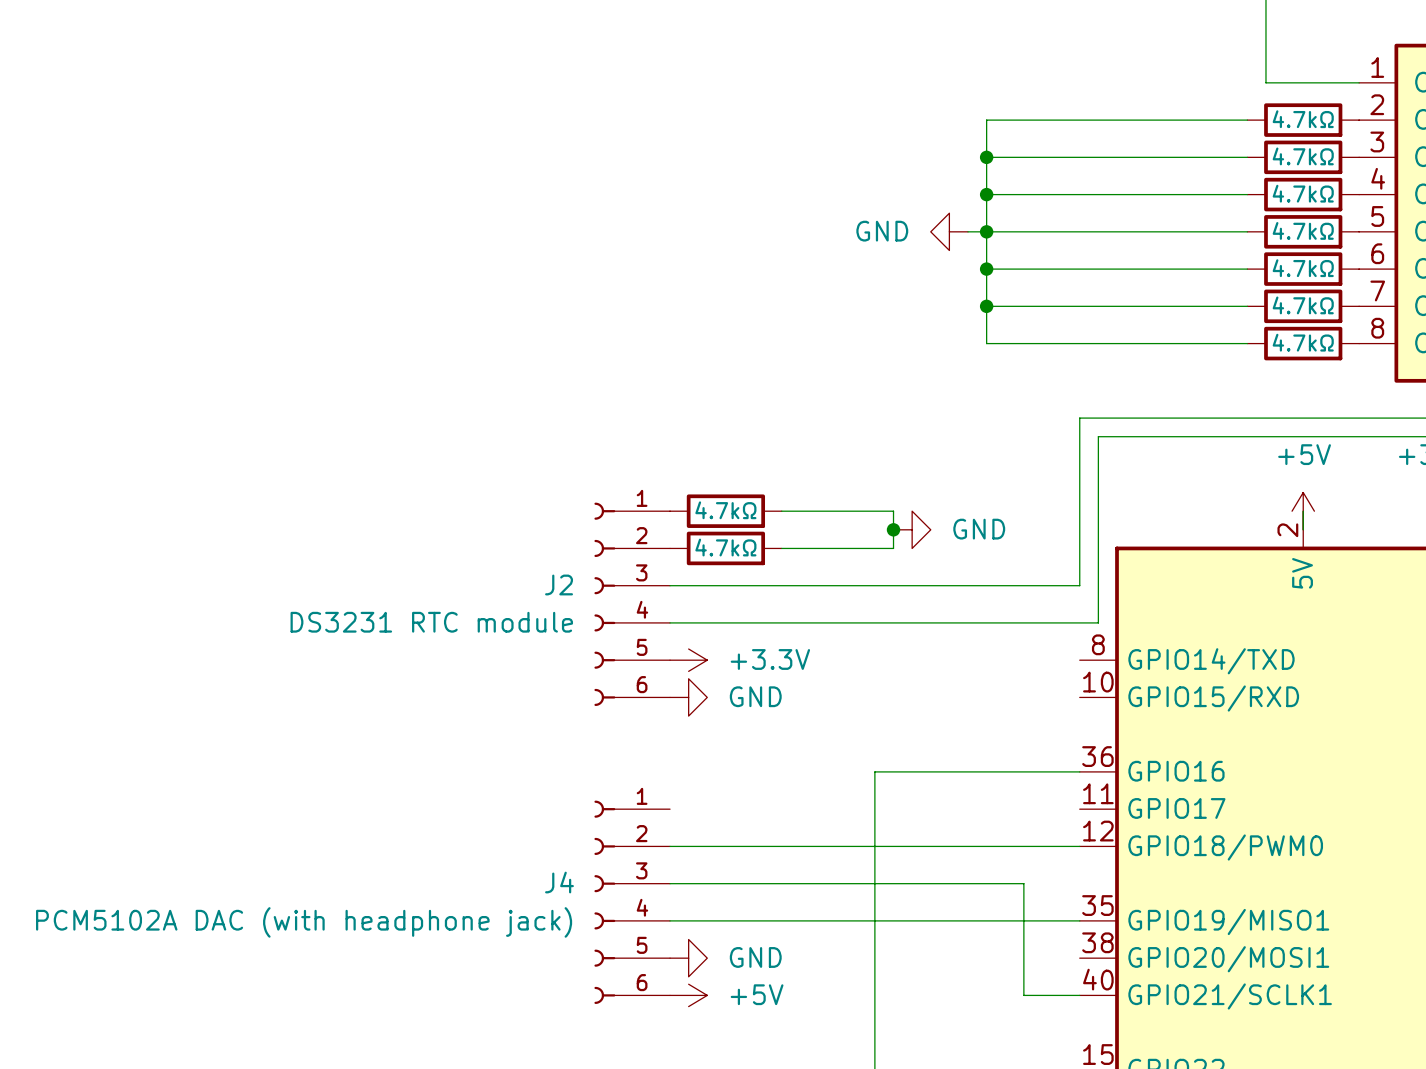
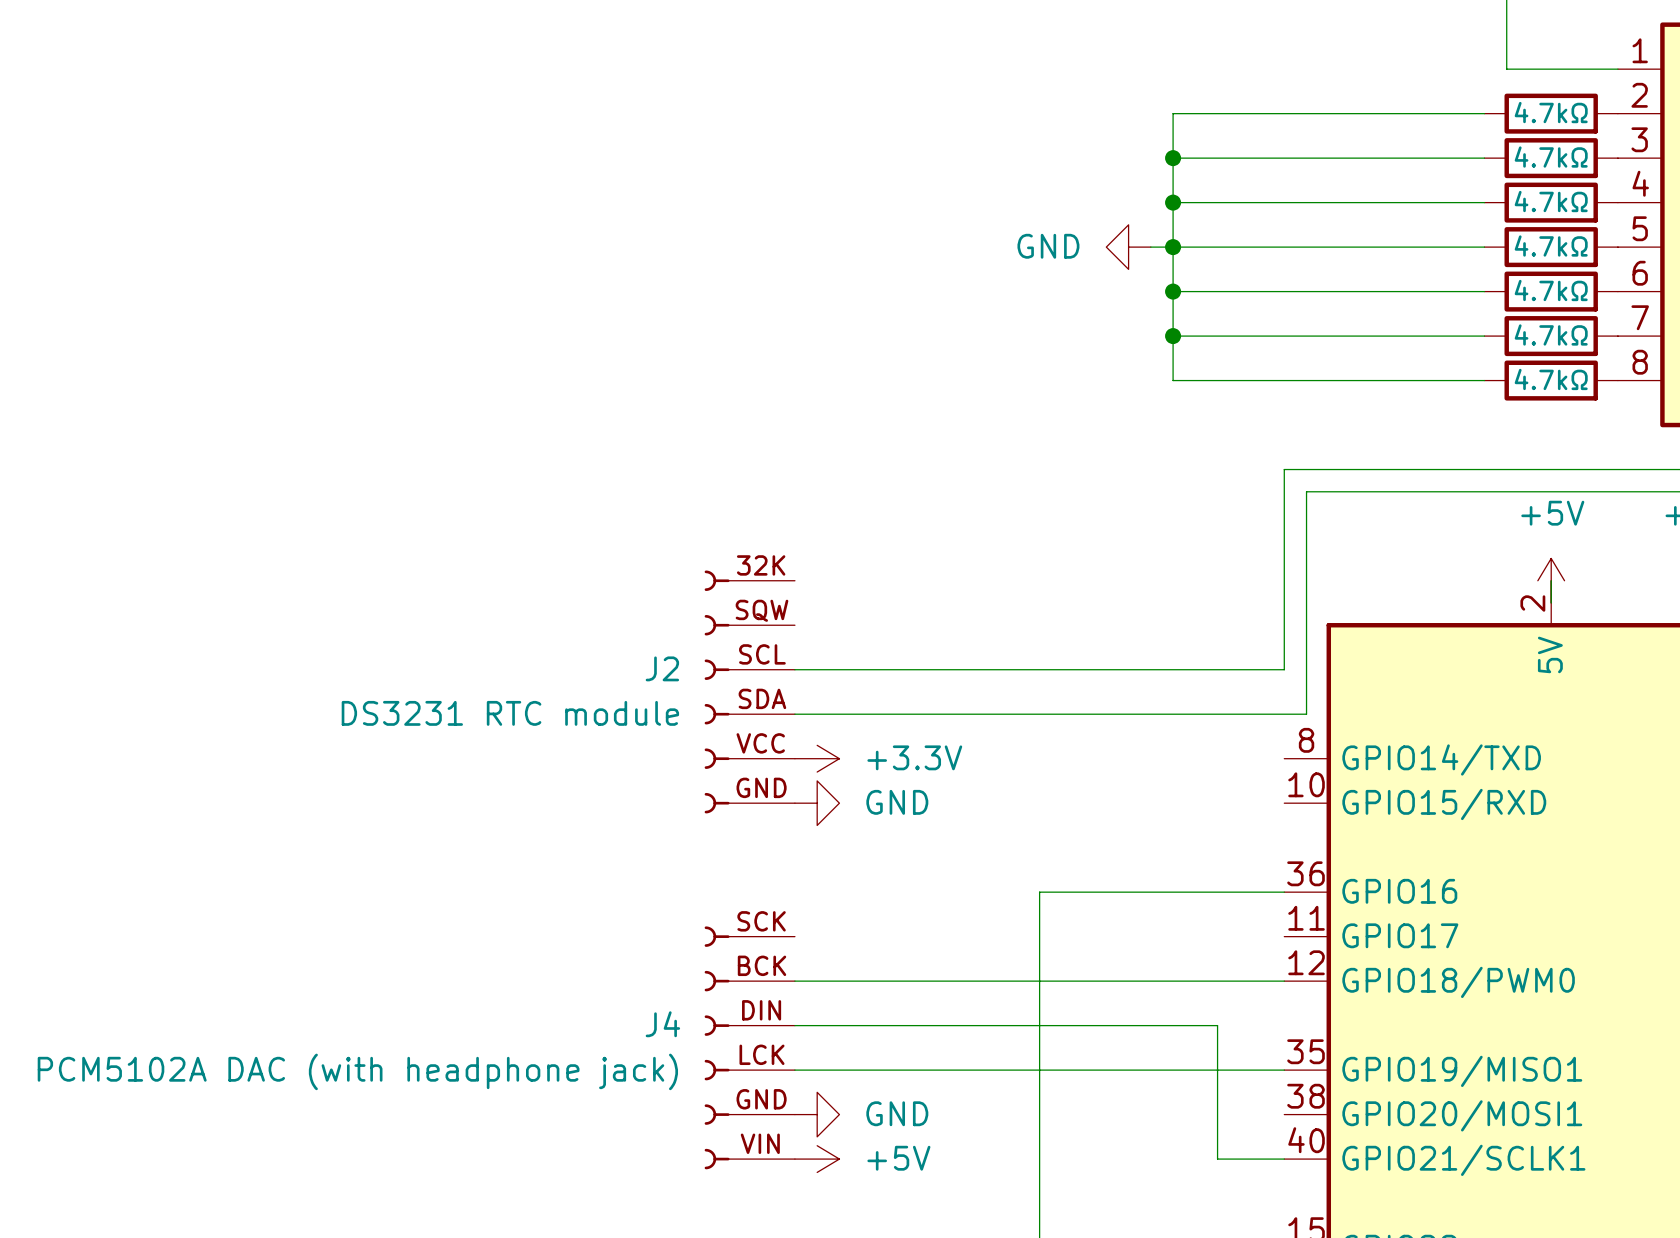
J2 pin number: 1 (642, 498) -> 32K (761, 565)
part: 4.7kΩ (725, 511) -> none
wire: (781, 511) (893, 511) (893, 548) (781, 548) -> none
junction: (893, 529) -> none
power symbol: GND (912, 529) -> none
J2 pin number: 2 (641, 535) -> SQW (762, 610)
part: 4.7kΩ (725, 548) -> none
J2 pin number: 3 (641, 572) -> SCL (762, 654)
J2 pin number: 4 (642, 609) -> SDA (762, 698)
J2 pin number: 5 (642, 647) -> VCC (760, 743)
J2 pin number: 6 (642, 684) -> GND (761, 787)
J4 pin number: 1 (642, 796) -> SCK (761, 921)
J4 pin number: 2 (641, 833) -> BCK (762, 965)
J4 pin number: 3 (641, 870) -> DIN (761, 1010)
J4 pin number: 4 (642, 907) -> LCK (762, 1054)
J4 pin number: 5 (642, 945) -> GND (761, 1099)
J4 pin number: 6 (642, 982) -> VIN (760, 1143)

